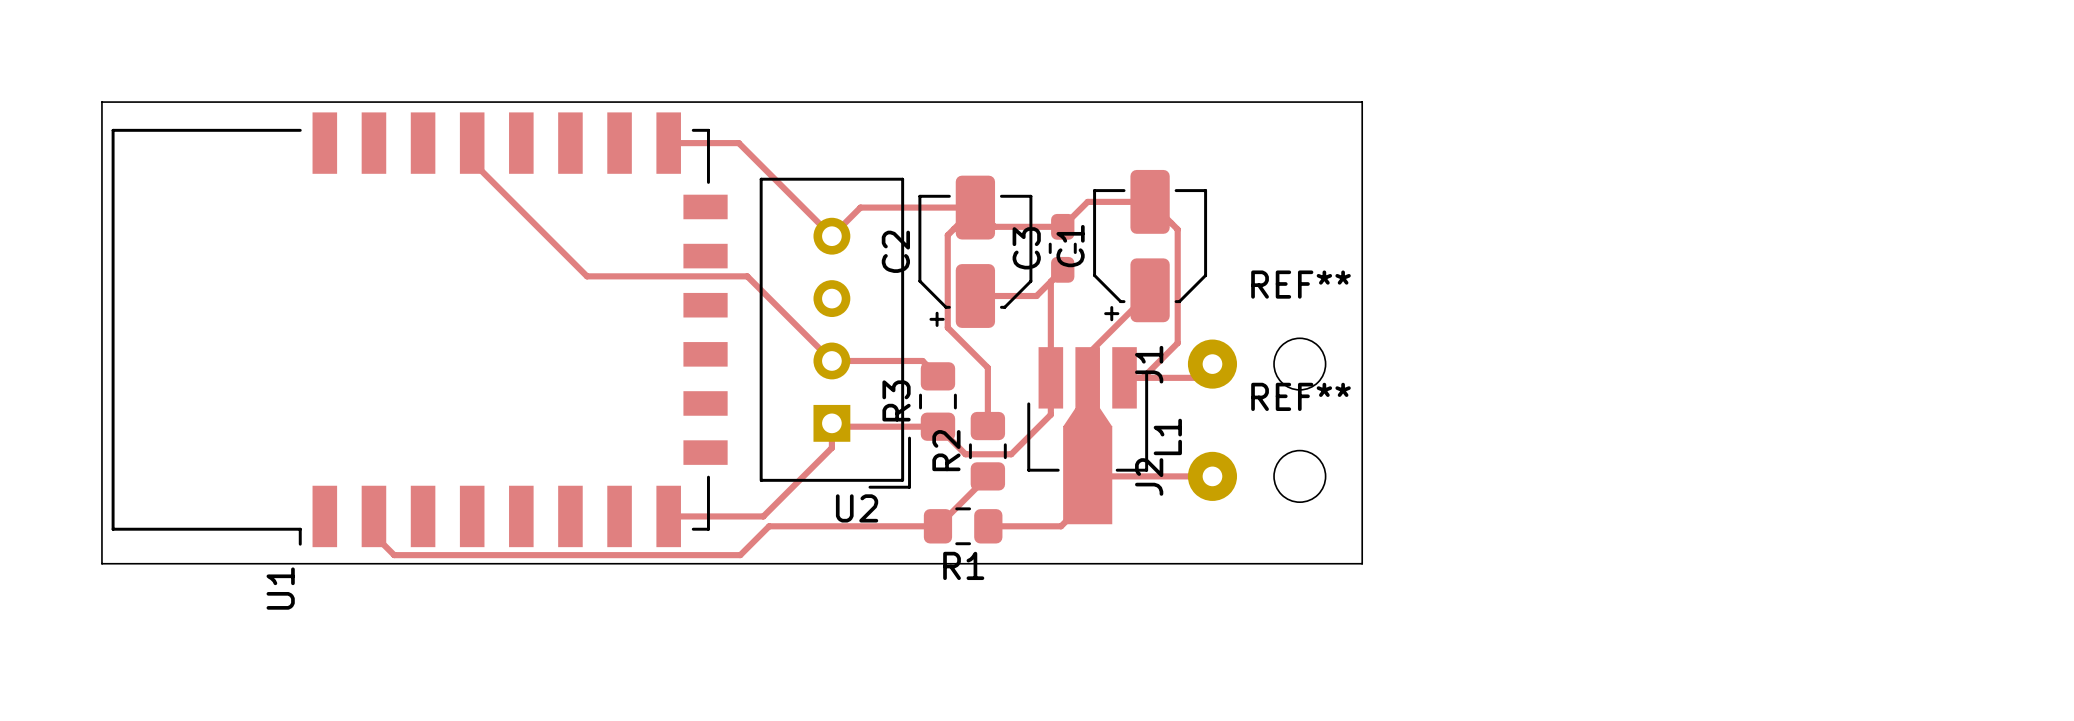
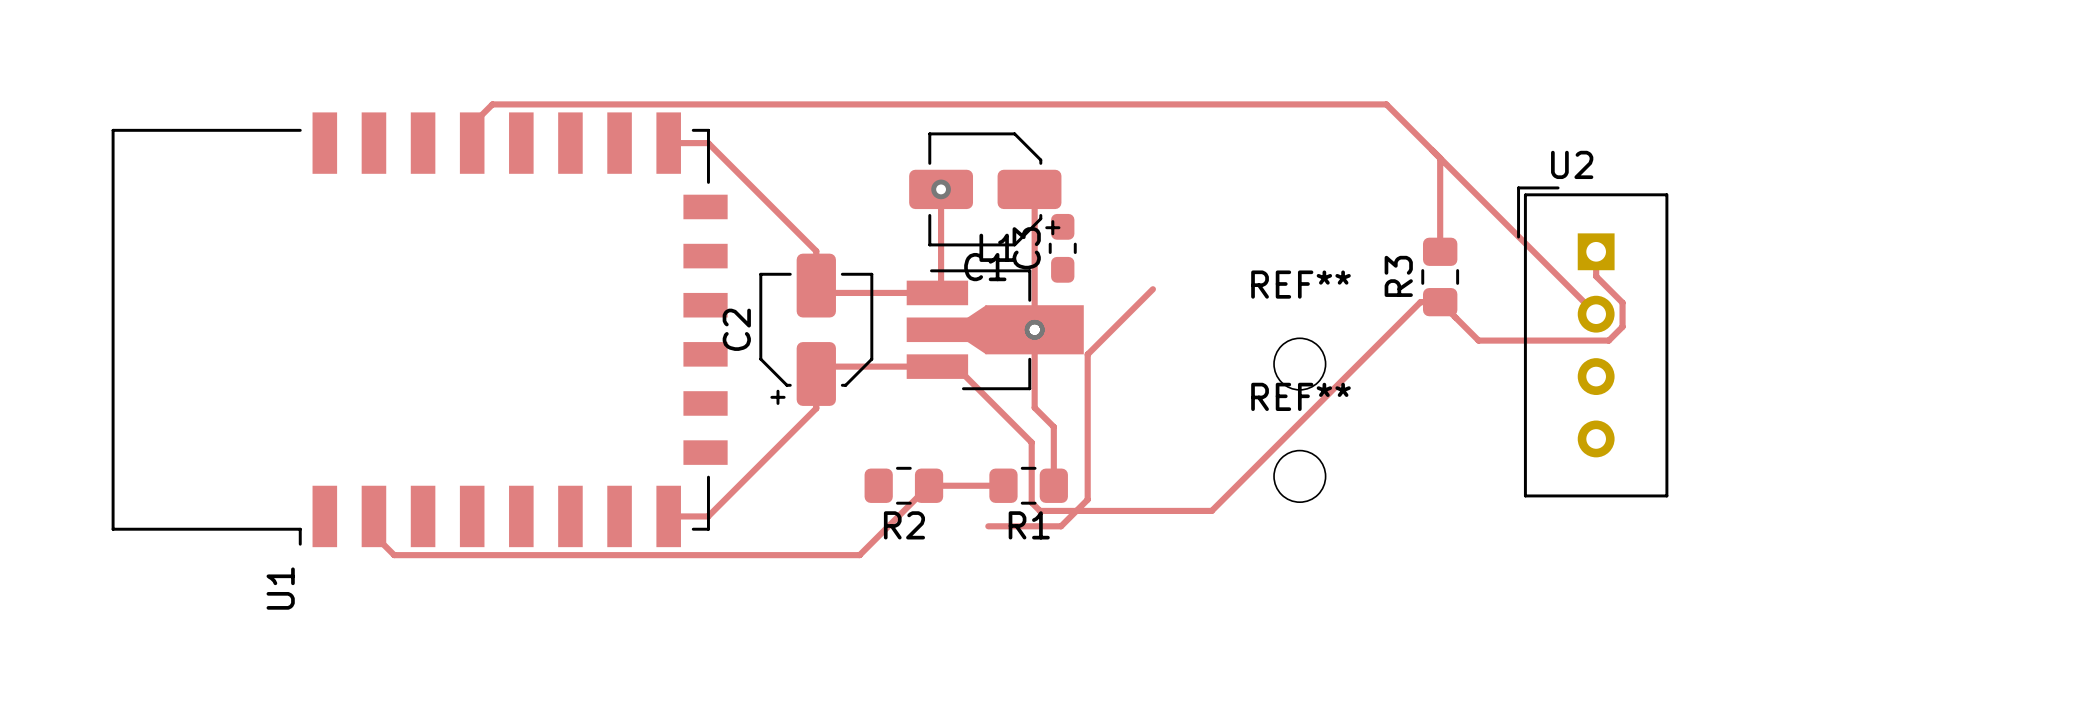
board edge: (101, 102) (101, 563) (1362, 563) (1362, 102) (101, 102) -> none
track: (472, 143) (472, 161) (587, 276) (747, 276) (831, 360) (922, 360) (937, 376) -> (472, 143) (472, 124) (492, 104) (1386, 104) (1596, 314)
track: (708, 143) (738, 143) (831, 236) (860, 207) (975, 207) -> (708, 143) (816, 251) (816, 285) (823, 292) (937, 292) (941, 289) (941, 189)
track: none -> (1440, 158) (1440, 251)
via: none -> (941, 189)
track: none -> (1029, 189) (1034, 194) (1034, 407) (1053, 426) (1053, 485)
track: (975, 207) (947, 235) (947, 327) (987, 367) (987, 426) -> none
track: (975, 207) (994, 226) (1062, 226) (1087, 201) (1150, 201) (1177, 229) (1177, 343) (1142, 377) -> none
C1 rotation: 0° (1150, 246) -> 90° counterclockwise (985, 189)
C1 position: (1150, 246) -> (985, 189)
C2 position: (975, 251) -> (816, 329)
track: (1062, 269) (1036, 296) (975, 296) -> none
track: (1050, 281) (1050, 414) (1011, 454) (965, 454) (937, 426) (835, 426) (831, 423) (831, 447) (763, 516) (708, 516) -> (1596, 251) (1596, 276) (1622, 302) (1622, 326) (1608, 340) (1478, 340) (1440, 302) (1420, 302) (1211, 510) (1039, 510) (1031, 502) (1031, 442) (955, 366) (823, 366) (816, 373) (816, 408) (708, 516)
via: none -> (1034, 329)
U2 rotation: 0° (835, 333) -> 180° (1592, 341)
U2 position: (835, 333) -> (1592, 341)
track: (1212, 364) (1198, 377) (1124, 377) -> none
J1: (1212, 364) -> none
R3 position: (937, 401) -> (1440, 276)
L1 rotation: 0° (1087, 435) -> 90° counterclockwise (995, 329)
L1 position: (1087, 435) -> (995, 329)
R2 name position: R2 (946, 450) -> R2 (904, 525)
R2 rotation: 0° (987, 451) -> 90° clockwise (903, 485)
R2 position: (987, 451) -> (903, 485)
track: (1087, 475) (1212, 476) -> none
track: (987, 476) (937, 526) (769, 526) (740, 555) -> (1003, 485) (929, 485) (859, 555) (740, 555)
J2: (1212, 476) -> none
R1 position: (963, 526) -> (1028, 485)

